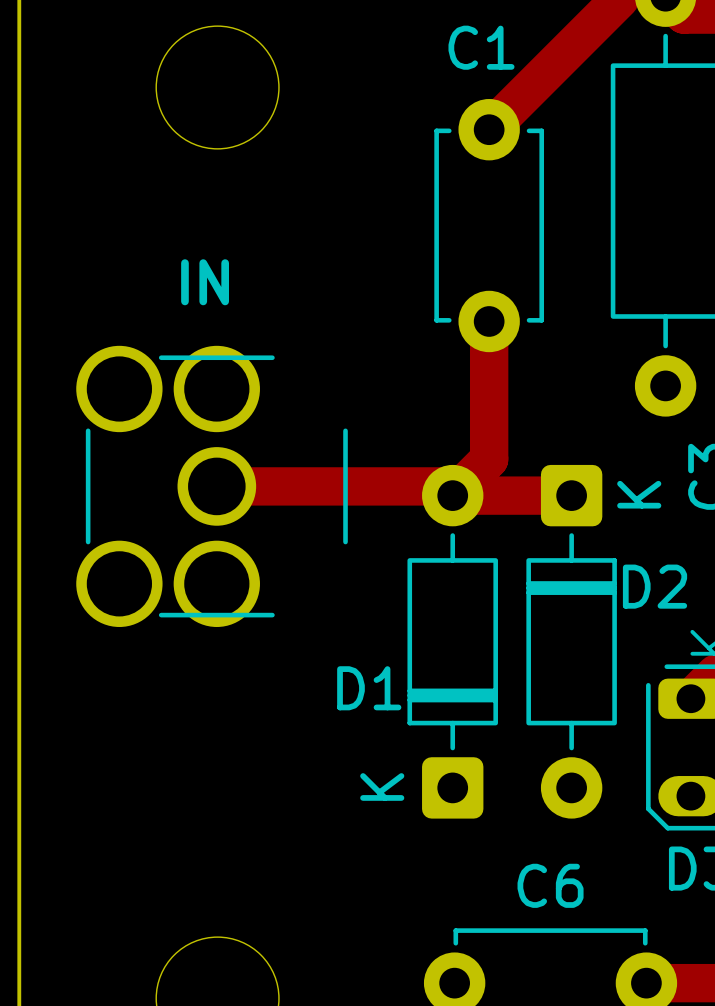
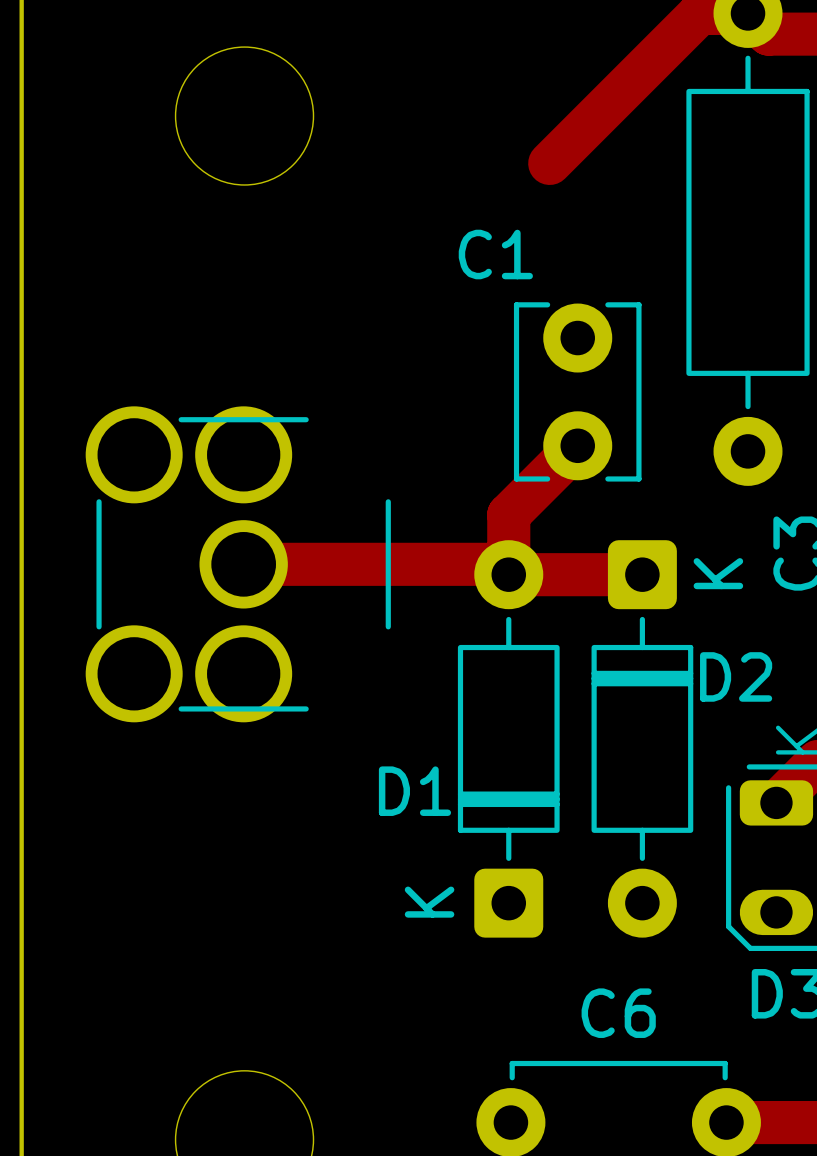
C1 name position: C1 (481, 47) -> C1 (495, 254)
C1 footprint: [434, 99, 545, 353] -> [513, 302, 642, 482]
text: IN (205, 282) -> none
track: (489, 321) (489, 459) (452, 495) -> (577, 445) (508, 514) (508, 574)

